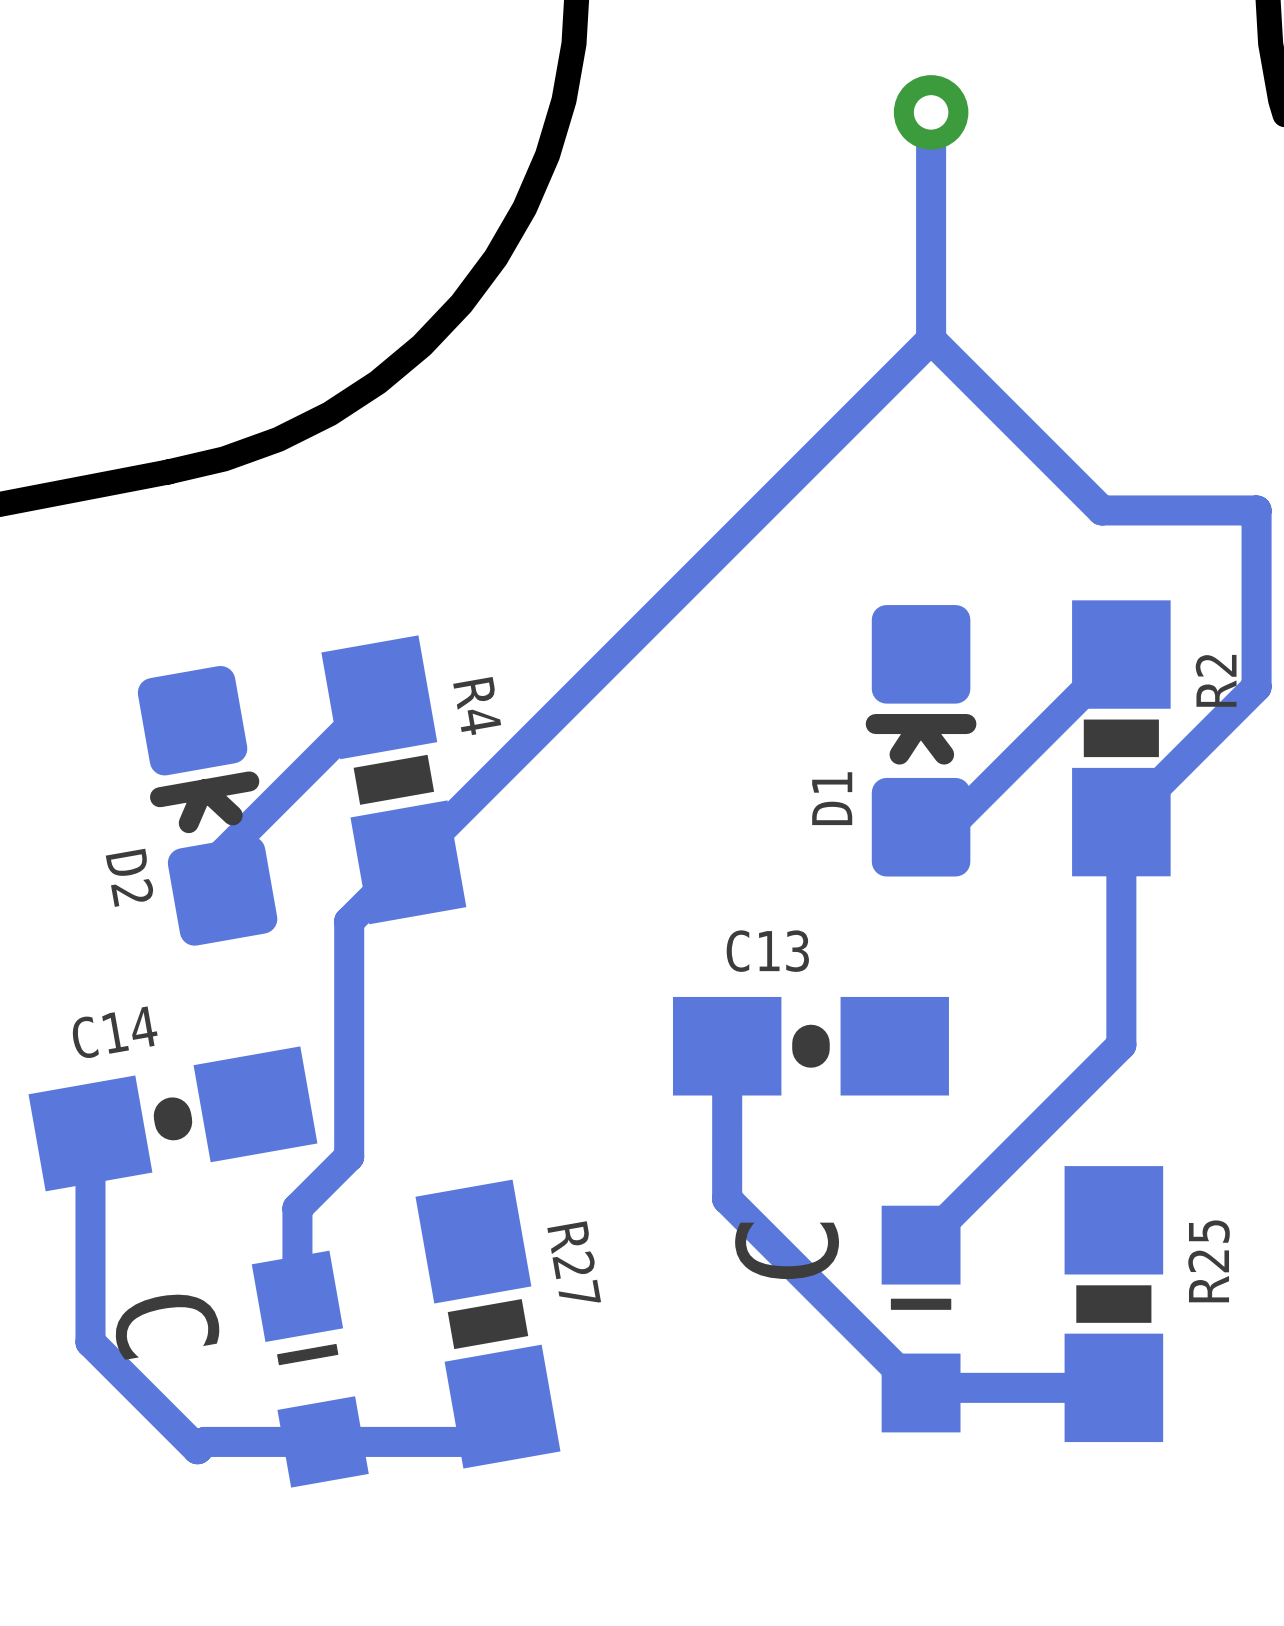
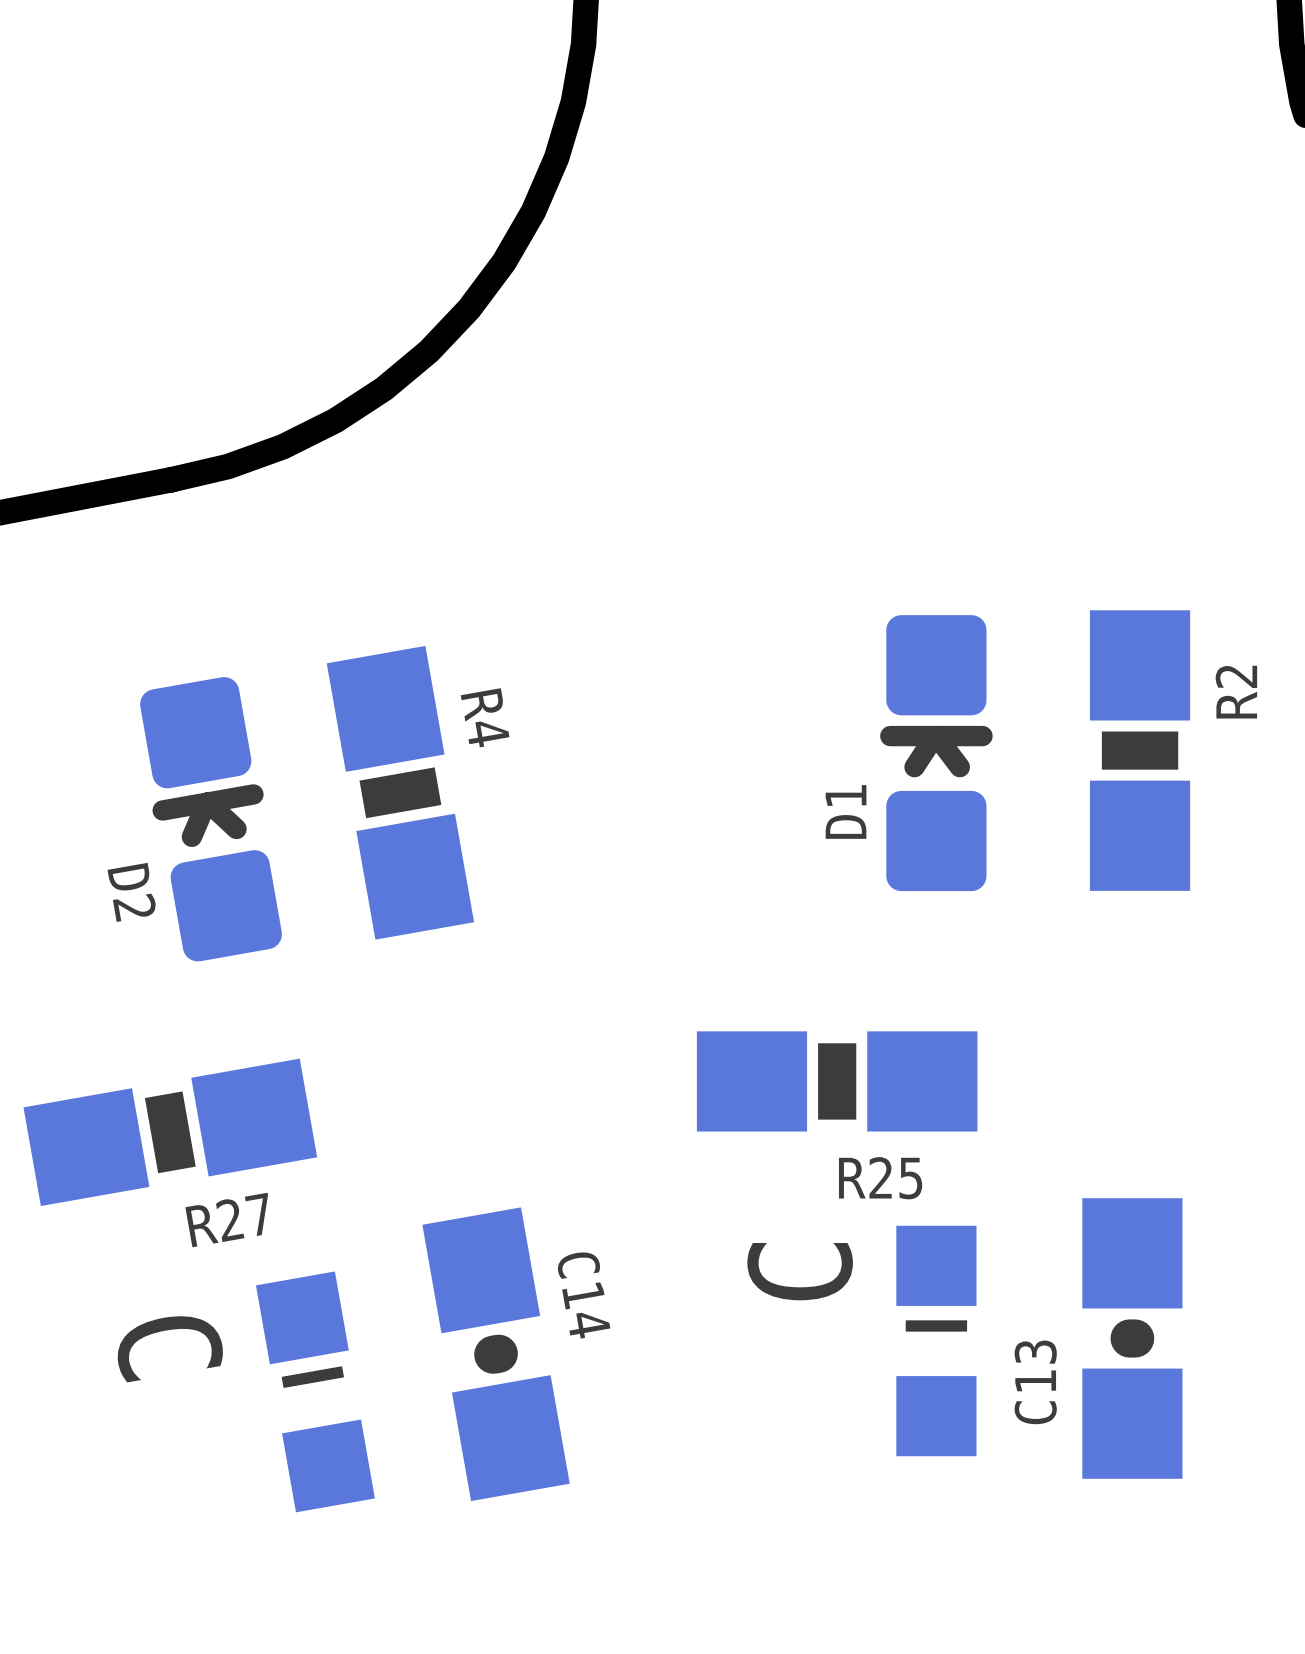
track: (931, 112) (931, 339) -> none
via: (931, 112) -> none
track: (931, 339) (349, 921) (349, 1156) (297, 1208) (297, 1296) -> none
track: (931, 339) (1101, 510) (1256, 510) (1256, 686) (1121, 822) (1121, 1044) (921, 1245) -> none
track: (1121, 654) (948, 827) (921, 827) -> none
track: (379, 697) (222, 853) (222, 890) -> none
track: (727, 1046) (727, 1199) (928, 1400) -> none
C13 rotation: 0° (810, 1046) -> 90° clockwise (1132, 1338)
C13 position: (810, 1046) -> (1132, 1338)
C14 rotation: 0° (172, 1118) -> 90° clockwise (496, 1354)
C14 position: (172, 1118) -> (496, 1354)
track: (90, 1133) (90, 1342) (197, 1449) (204, 1441) (467, 1441) (502, 1406) -> none
R25 rotation: 0° (1113, 1304) -> 90° clockwise (837, 1081)
R25 position: (1113, 1304) -> (837, 1081)
R27 rotation: 0° (487, 1324) -> 90° clockwise (170, 1132)
R27 position: (487, 1324) -> (170, 1132)
track: (1113, 1387) (926, 1387) (921, 1392) -> none

